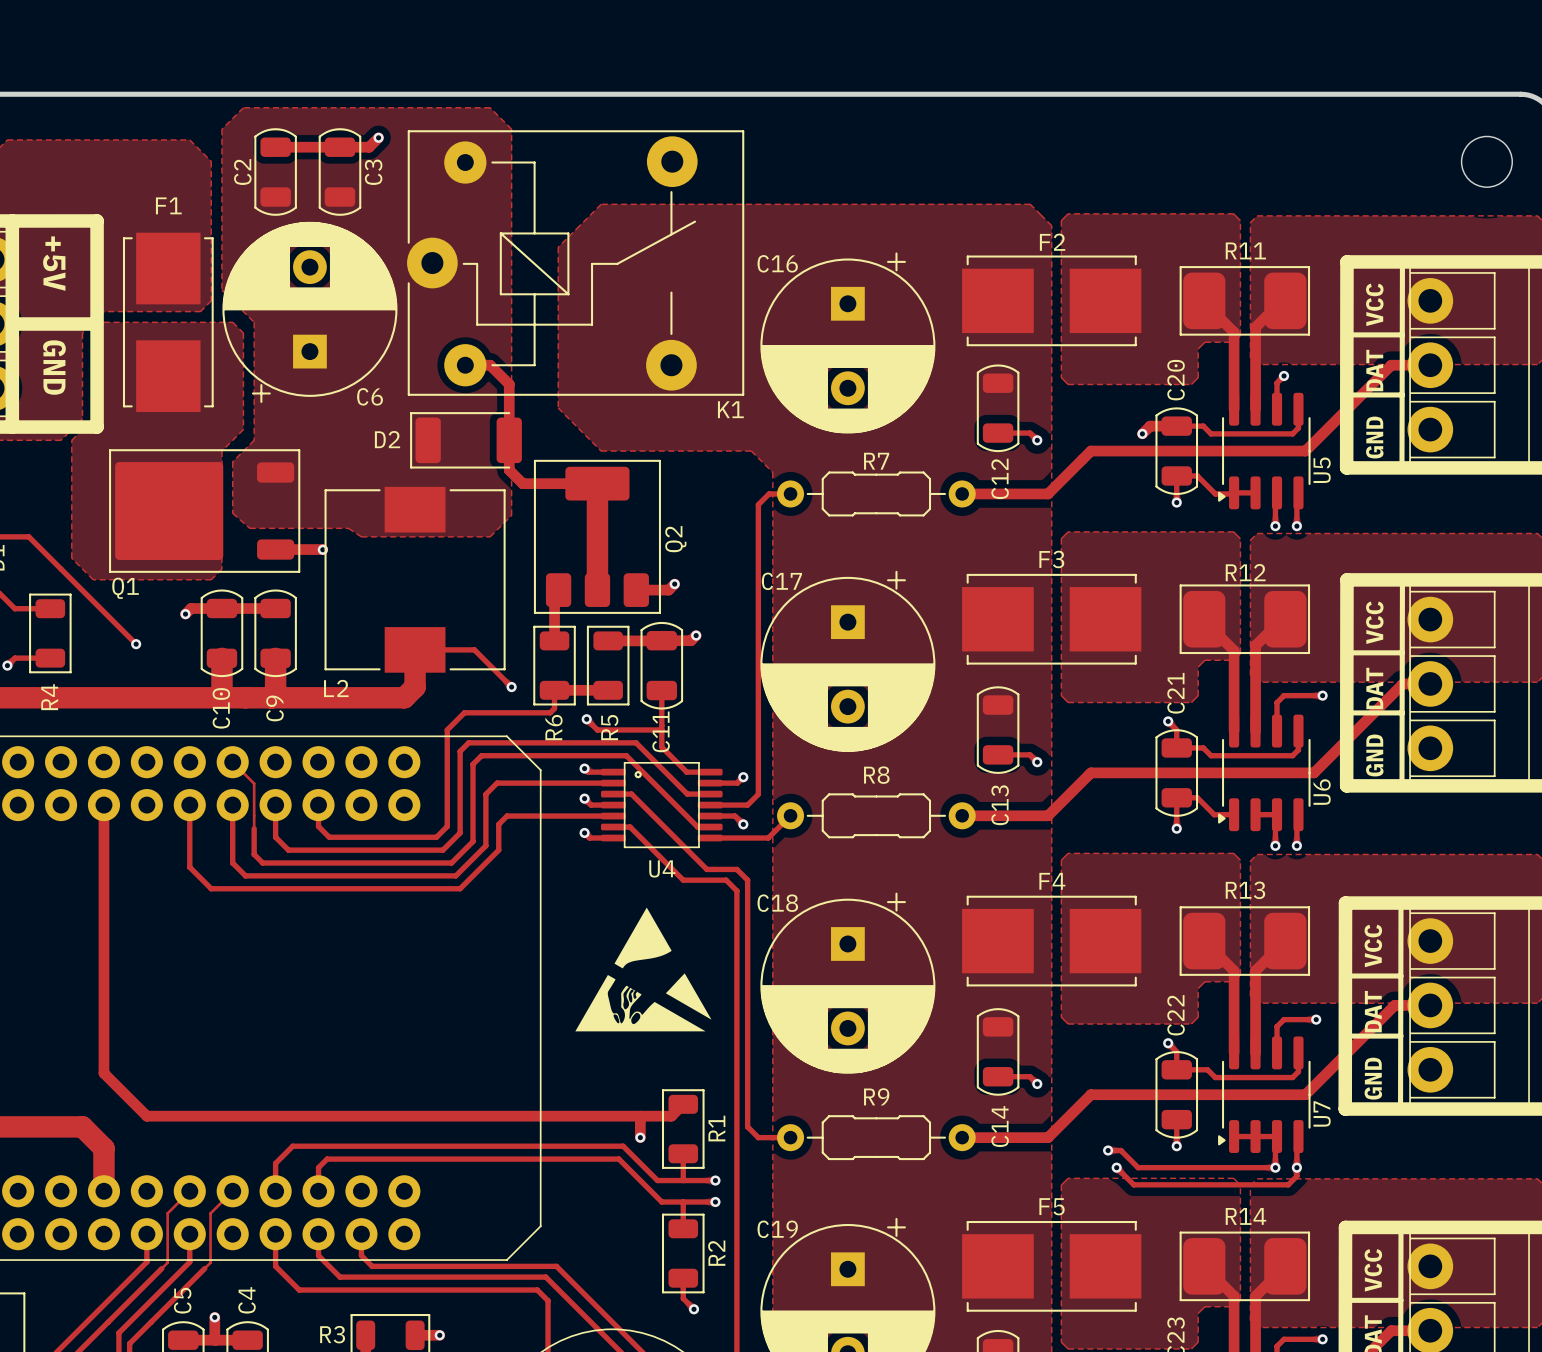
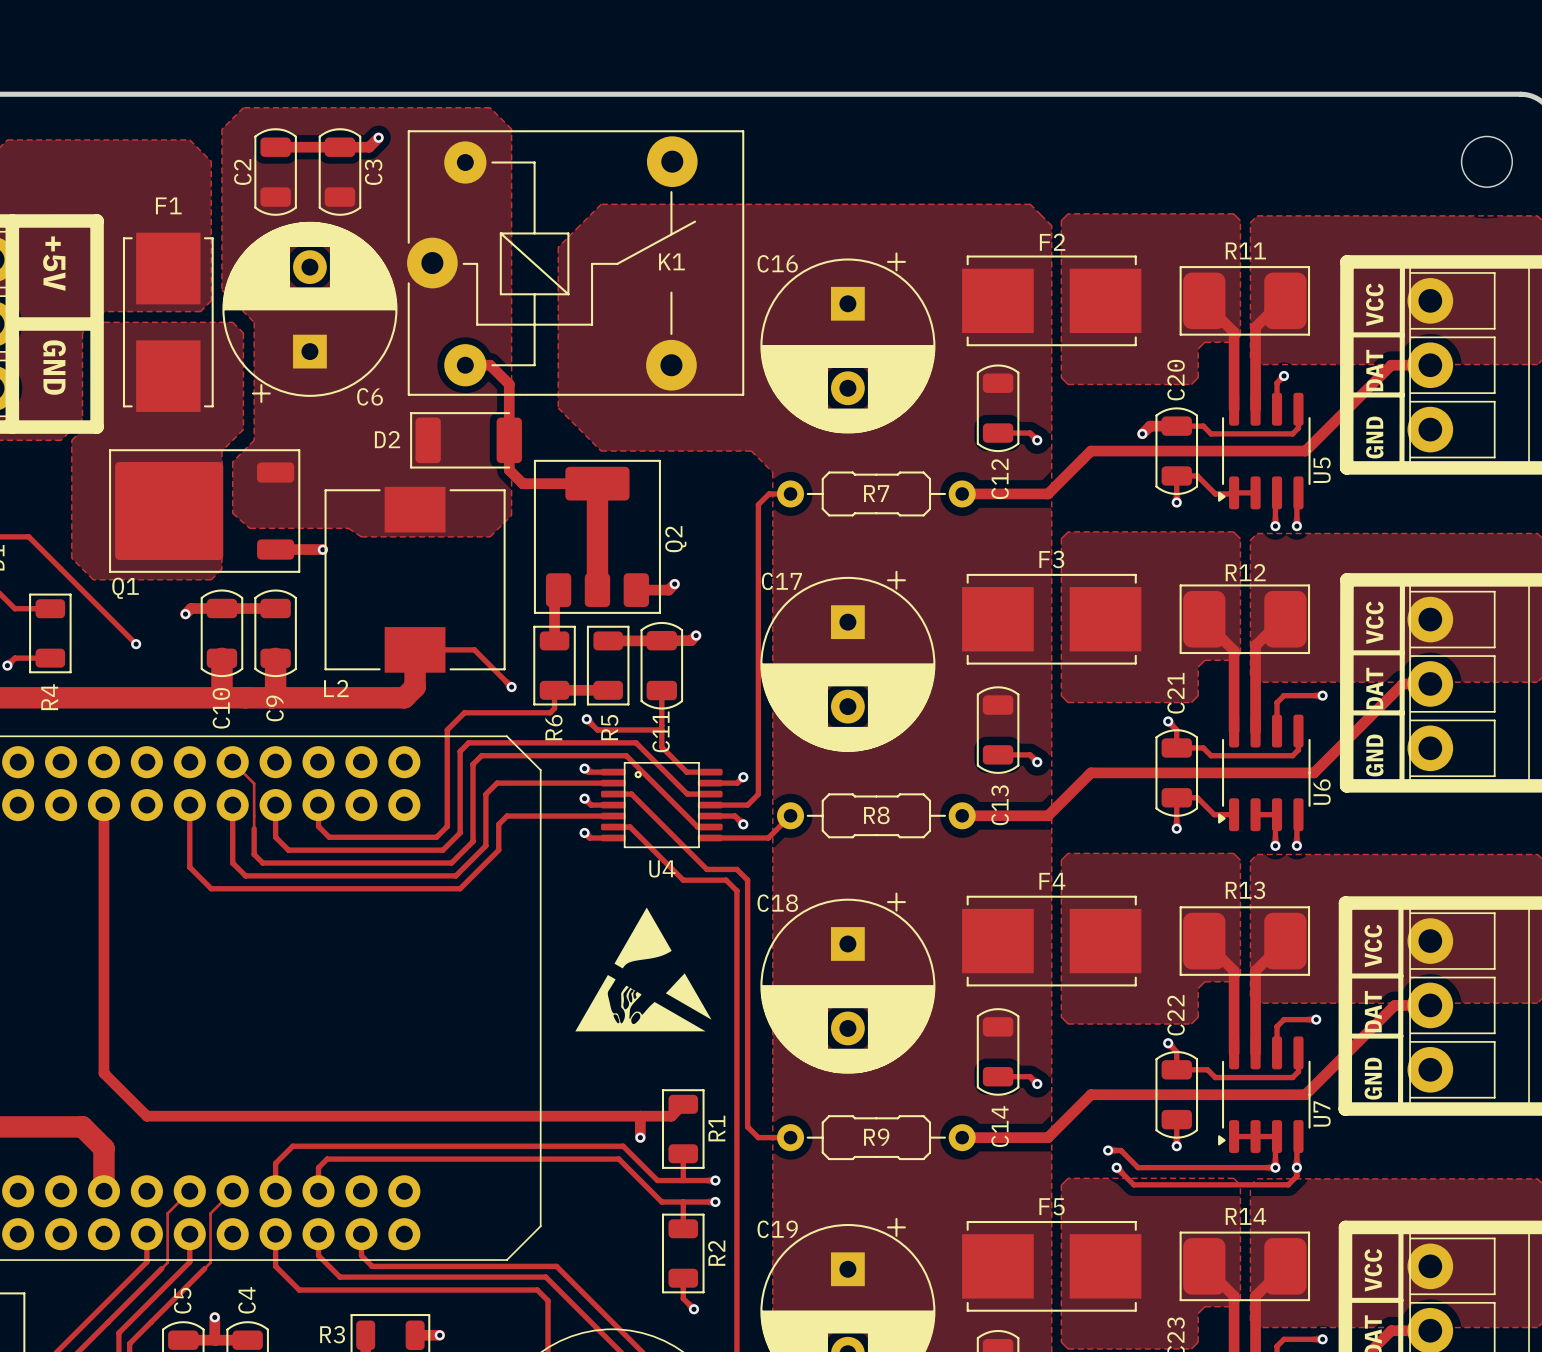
K1 name position: K1 (730, 409) -> K1 (671, 261)
R7 name position: R7 (876, 461) -> R7 (876, 493)
R8 name position: R8 (876, 775) -> R8 (876, 815)
R9 name position: R9 (876, 1096) -> R9 (876, 1137)

